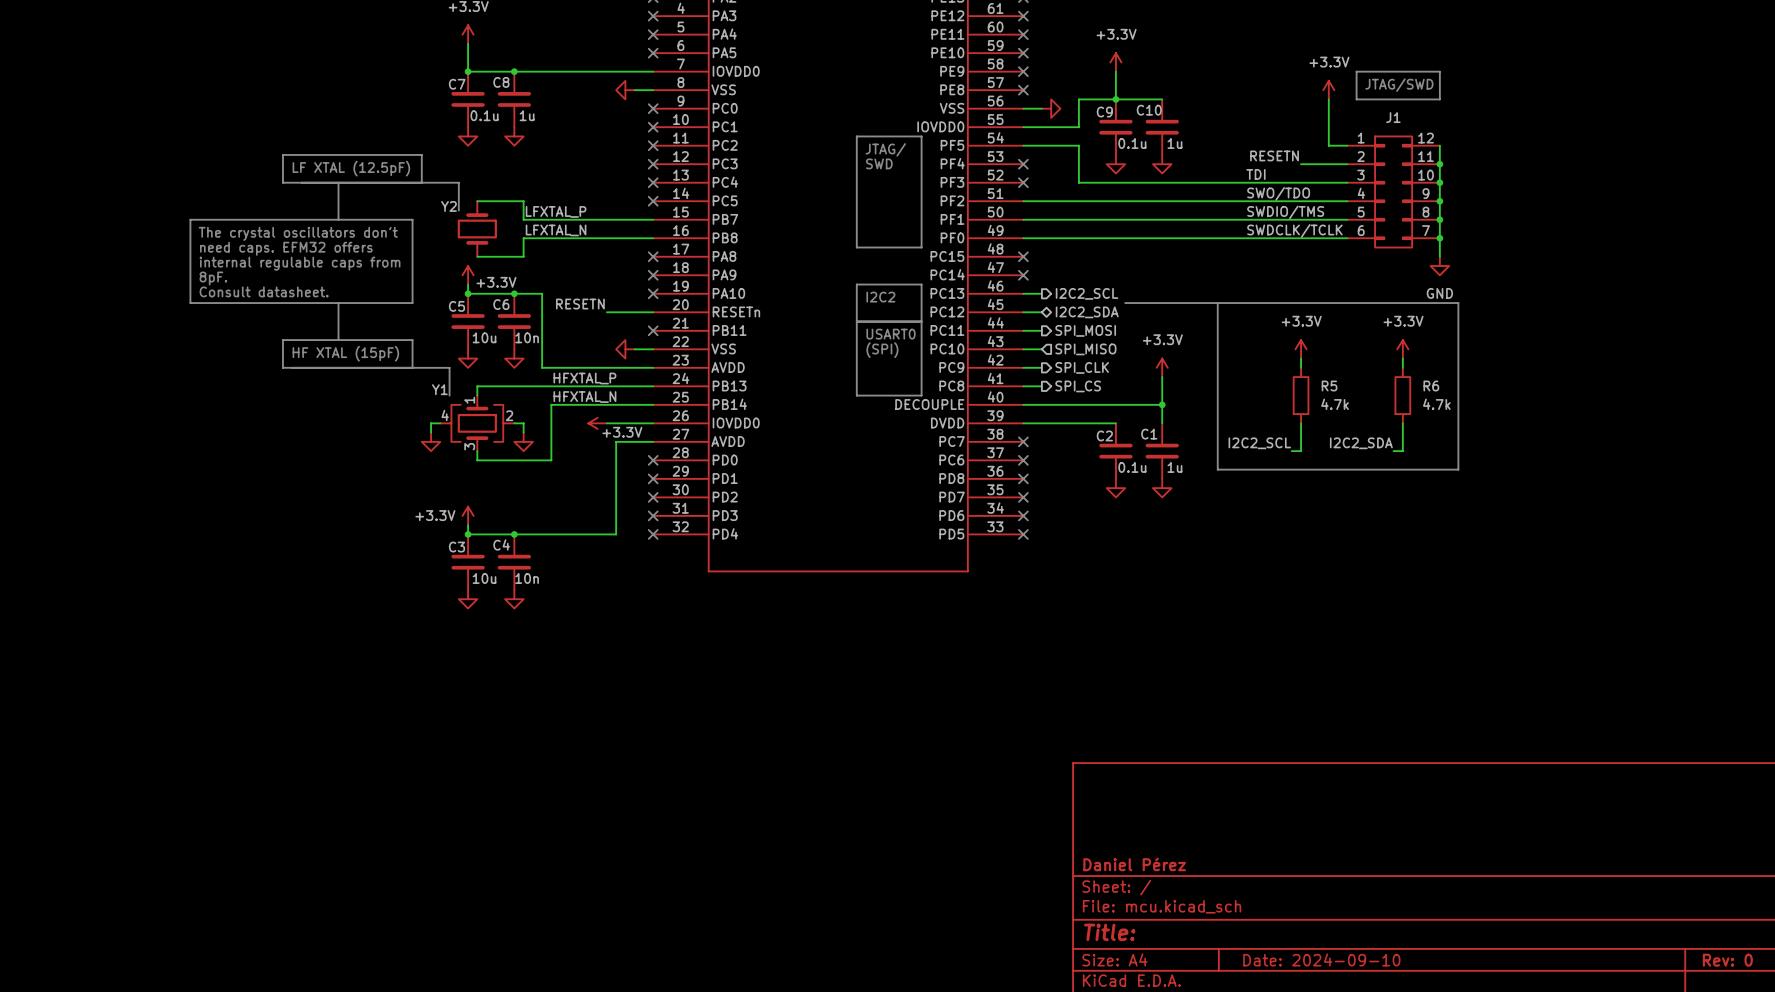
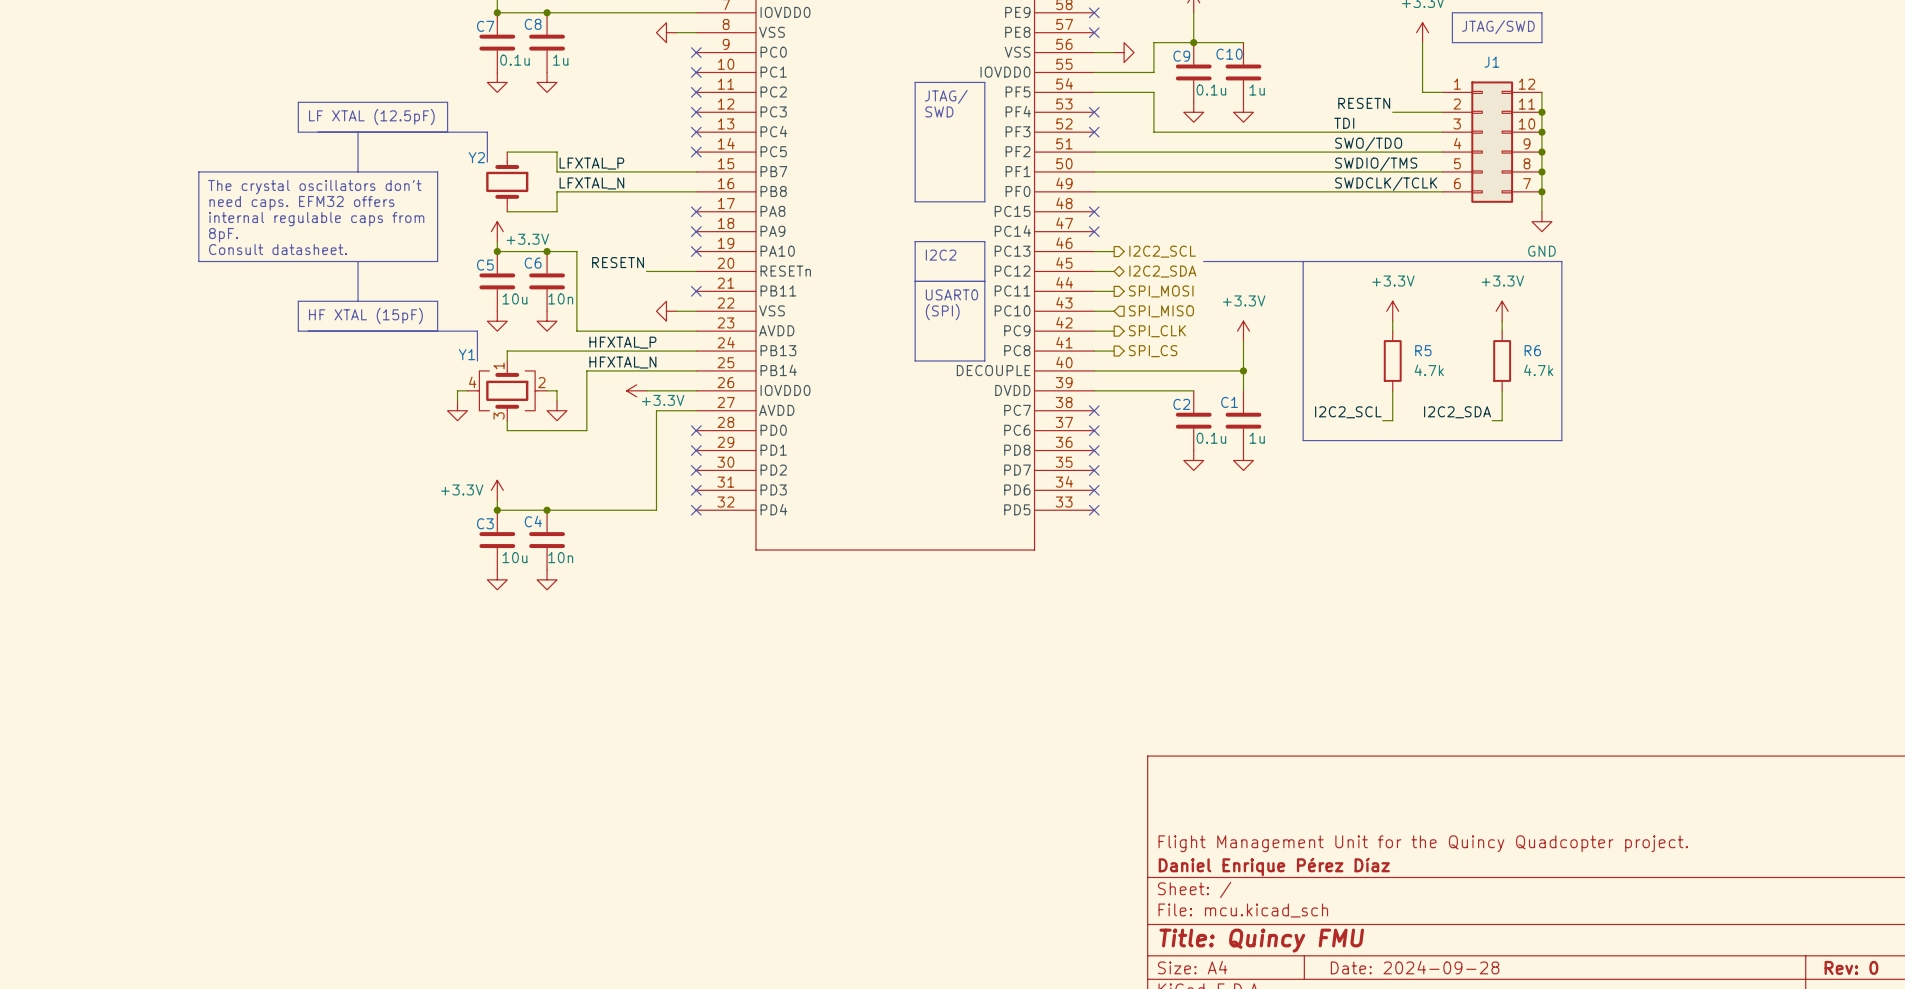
title block: none -> Flight Management Unit for the Quincy Quadcopter project. (1423, 843)
title block: Daniel Pérez (1134, 864) -> Daniel Enrique Pérez Díaz (1274, 866)
title block: Title: (1109, 932) -> Title: Quincy FMU (1261, 940)
title block: Date: 2024-09-10 (1321, 959) -> Date: 2024-09-28 (1415, 967)

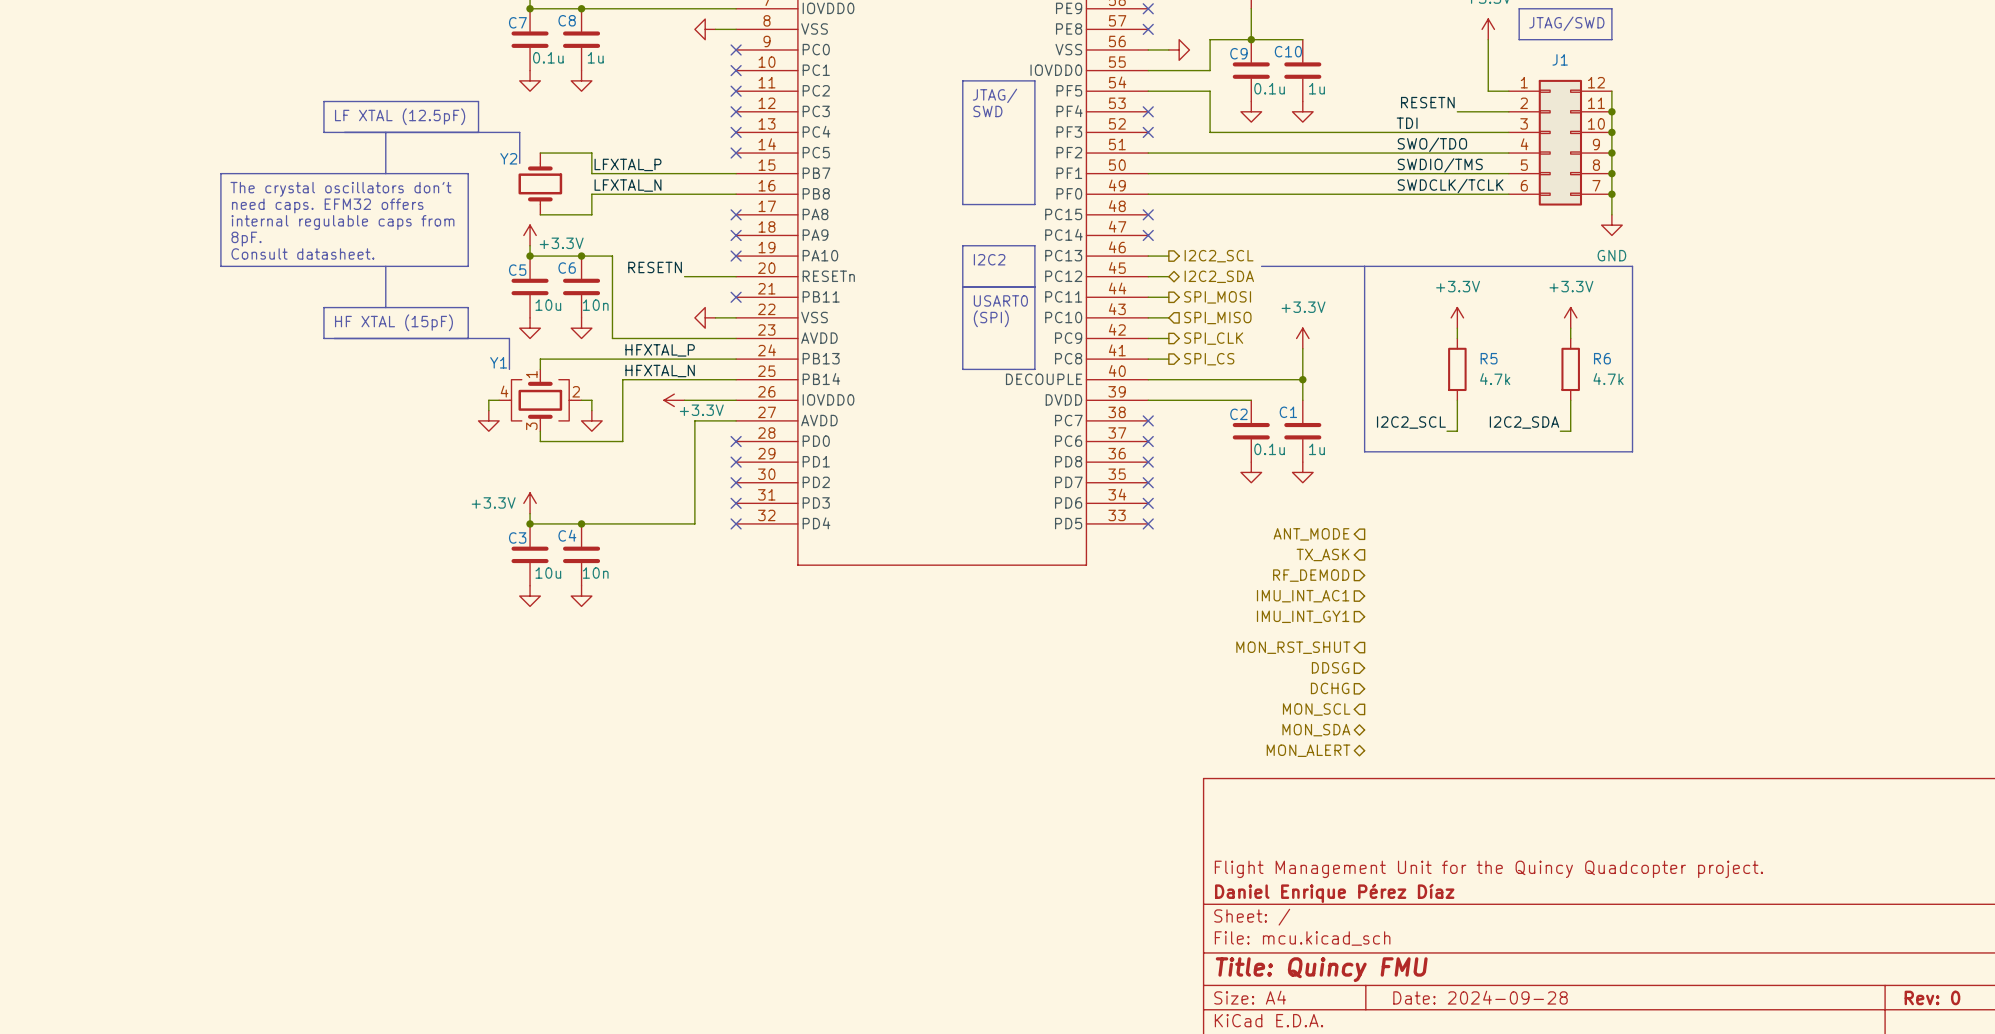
hierarchical label: none -> ANT_MODE (1311, 534)
hierarchical label: none -> TX_ASK (1323, 554)
hierarchical label: none -> RF_DEMOD (1311, 575)
hierarchical label: none -> IMU_INT_AC1 (1303, 596)
hierarchical label: none -> IMU_INT_GY1 (1303, 616)
hierarchical label: none -> MON_RST_SHUT (1293, 647)
hierarchical label: none -> DDSG (1330, 667)
hierarchical label: none -> DCHG (1330, 688)
hierarchical label: none -> MON_SCL (1316, 709)
hierarchical label: none -> MON_SDA (1316, 730)
hierarchical label: none -> MON_ALERT (1308, 750)

